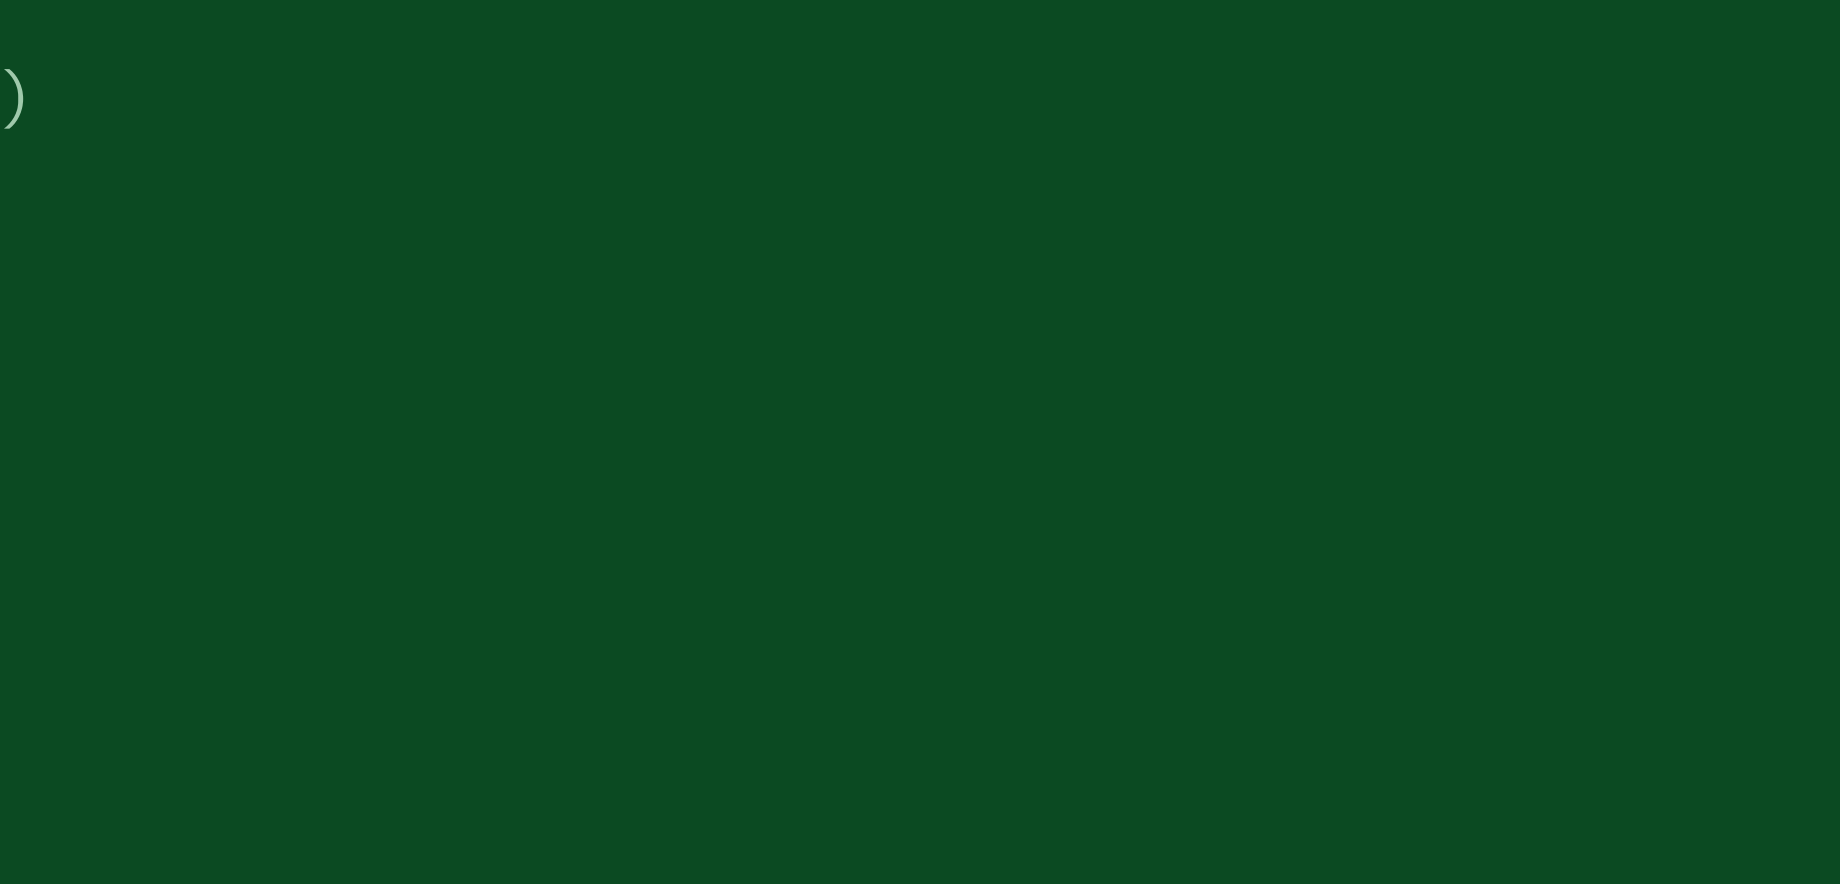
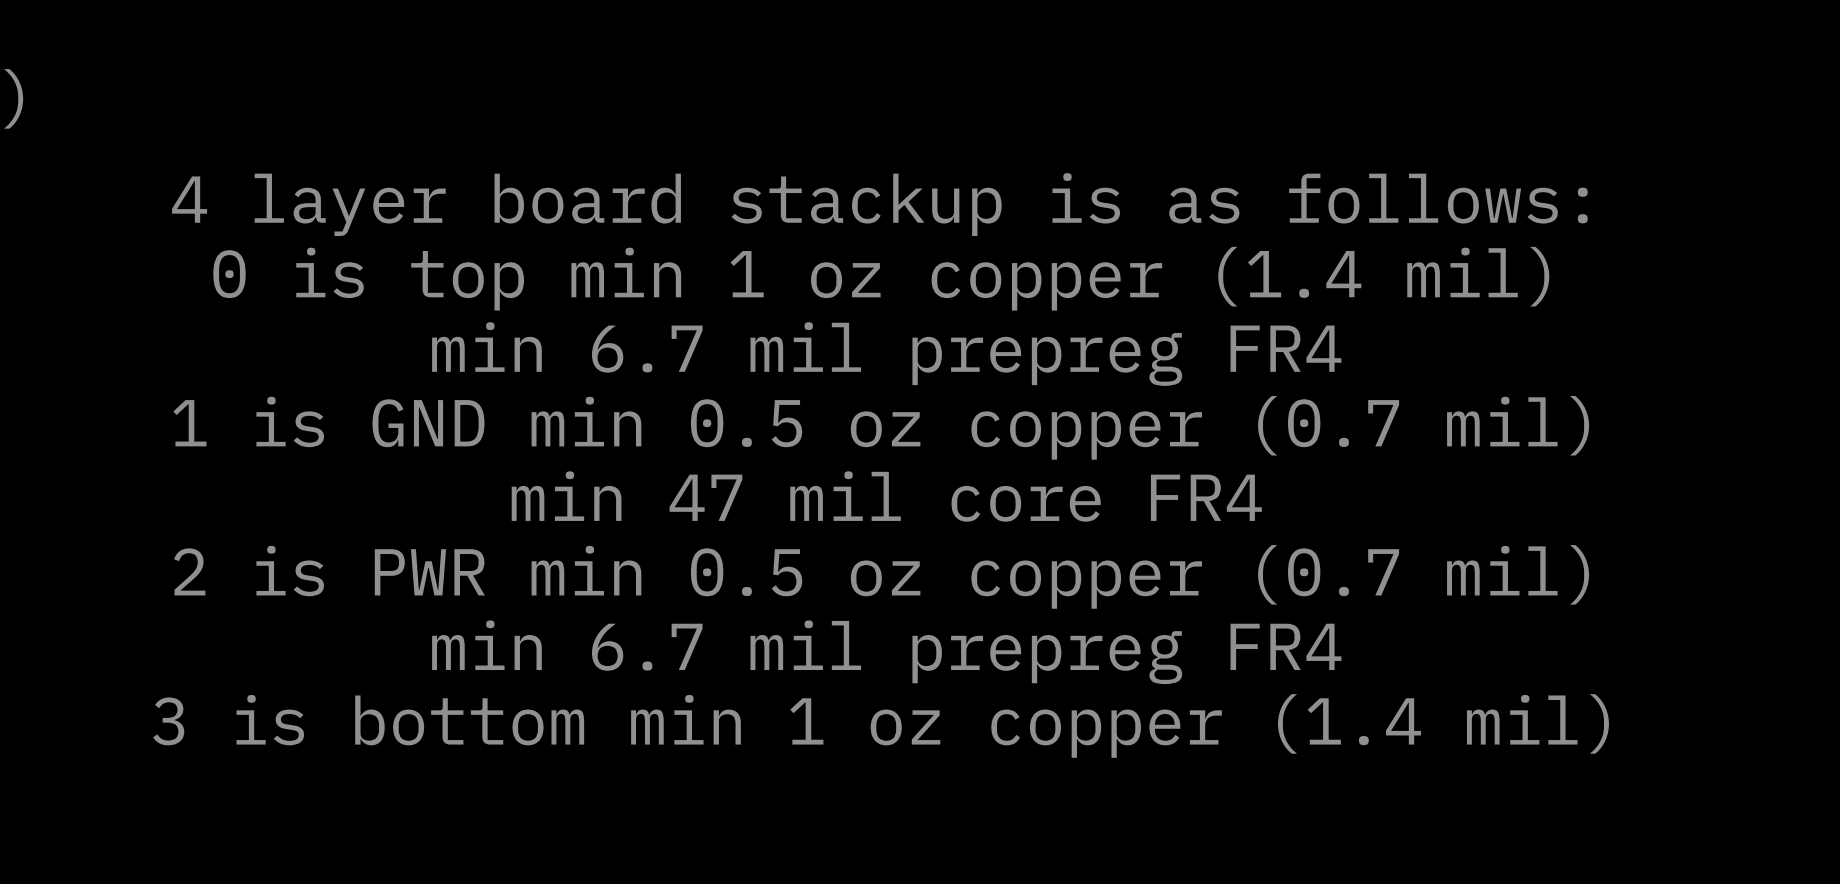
text: none -> 4 layer board stackup is as follows: (879, 204)
text: none -> 0 is top min 1 oz copper (1.4 mil) (881, 278)
text: none -> min 6.7 mil prepreg FR4 (886, 354)
text: none -> 1 is GND min 0.5 oz copper (0.7 mil) (881, 427)
text: none -> min 47 mil core FR4 (886, 496)
text: none -> 2 is PWR min 0.5 oz copper (0.7 mil) (881, 576)
text: none -> min 6.7 mil prepreg FR4 (886, 652)
text: none -> 3 is bottom min 1 oz copper (1.4 mil) (881, 725)

